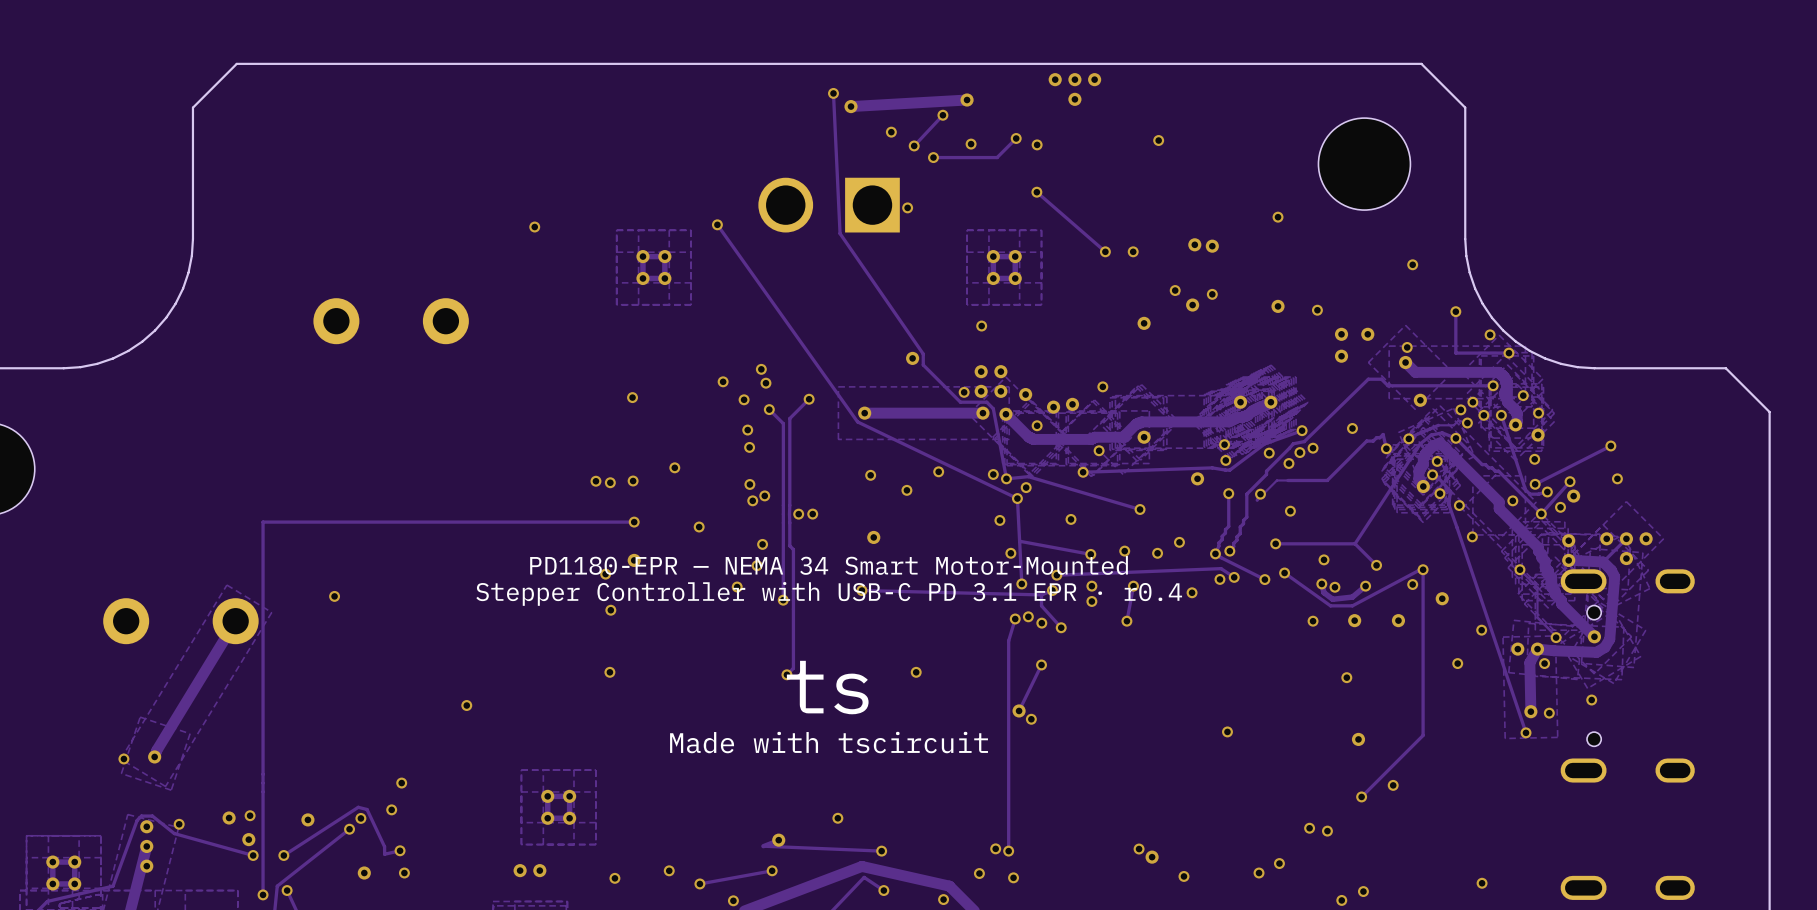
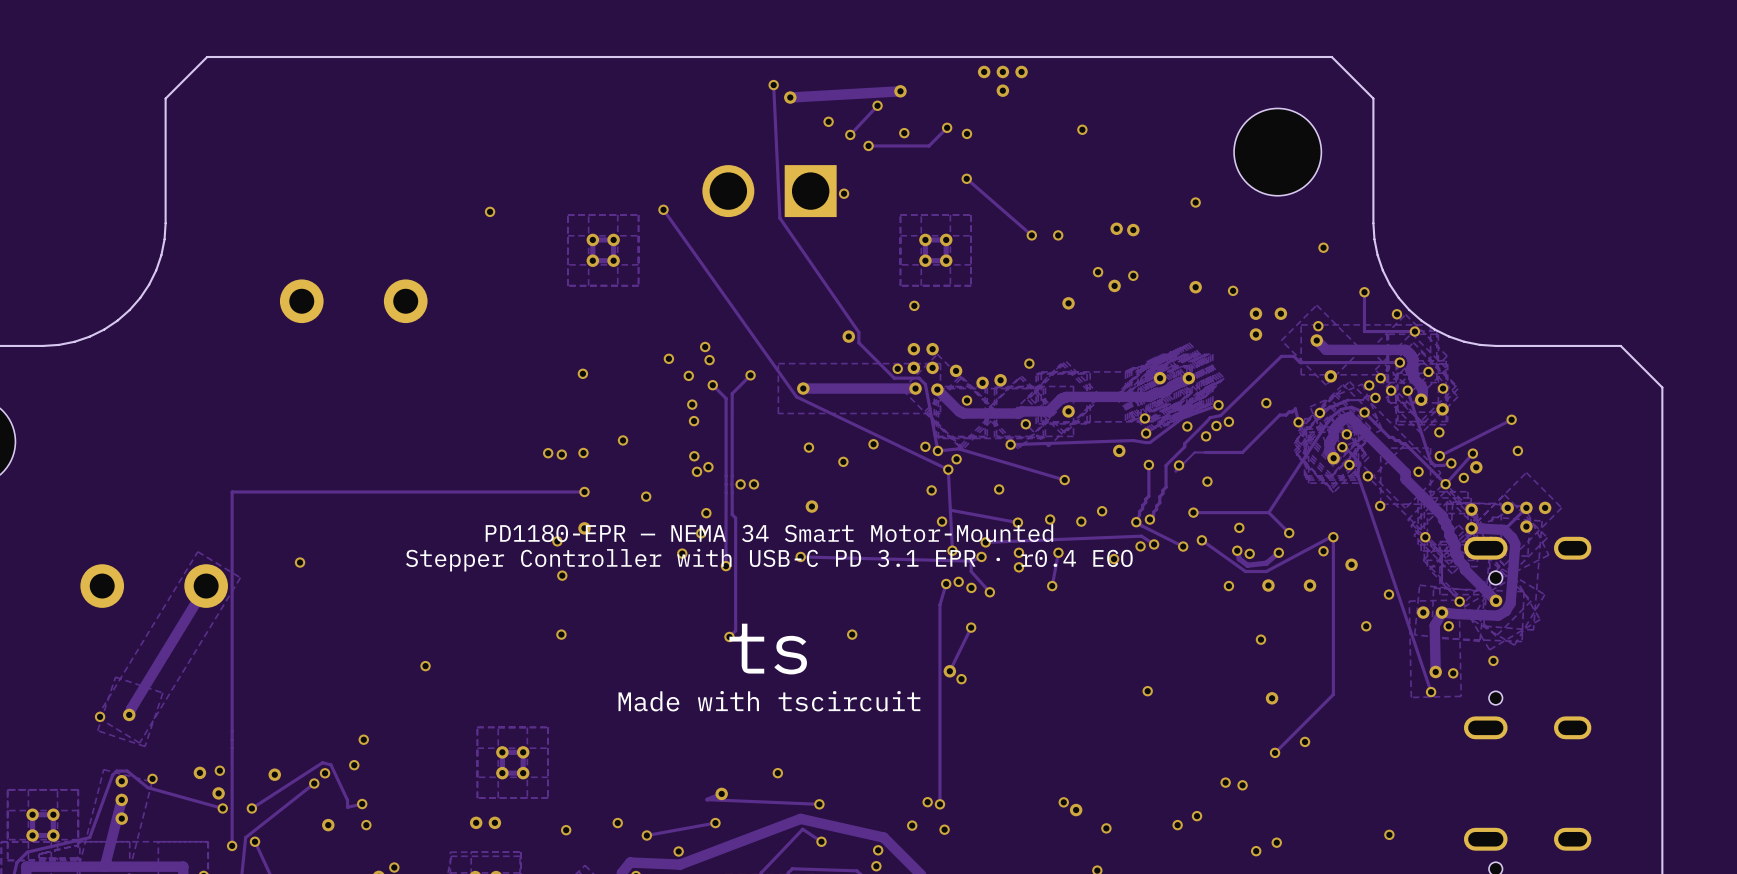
text: Stepper Controller with USB-C PD 3.1 EPR · r0.4 (829, 593) -> Stepper Controller with USB-C PD 3.1 EPR · r0.4 ECO (769, 560)

